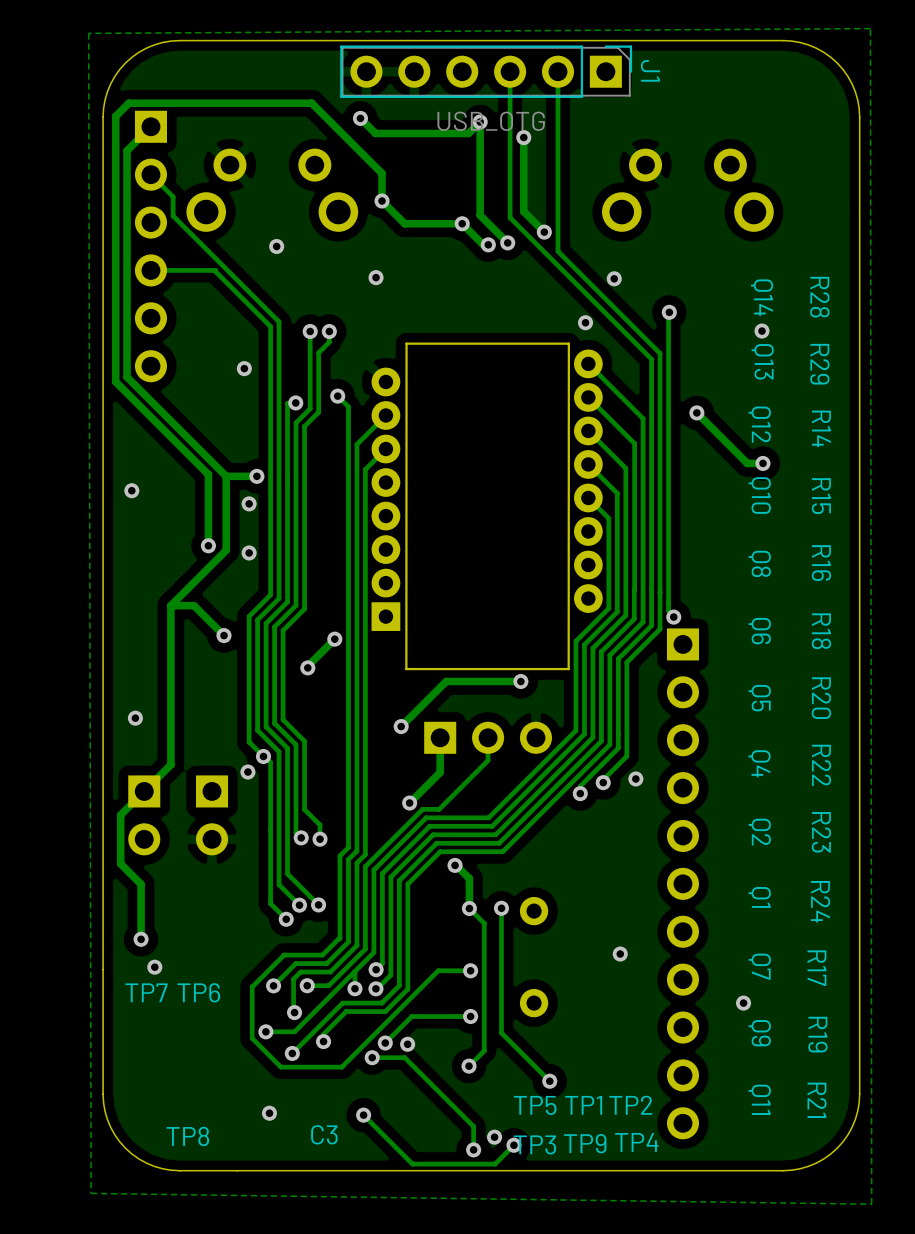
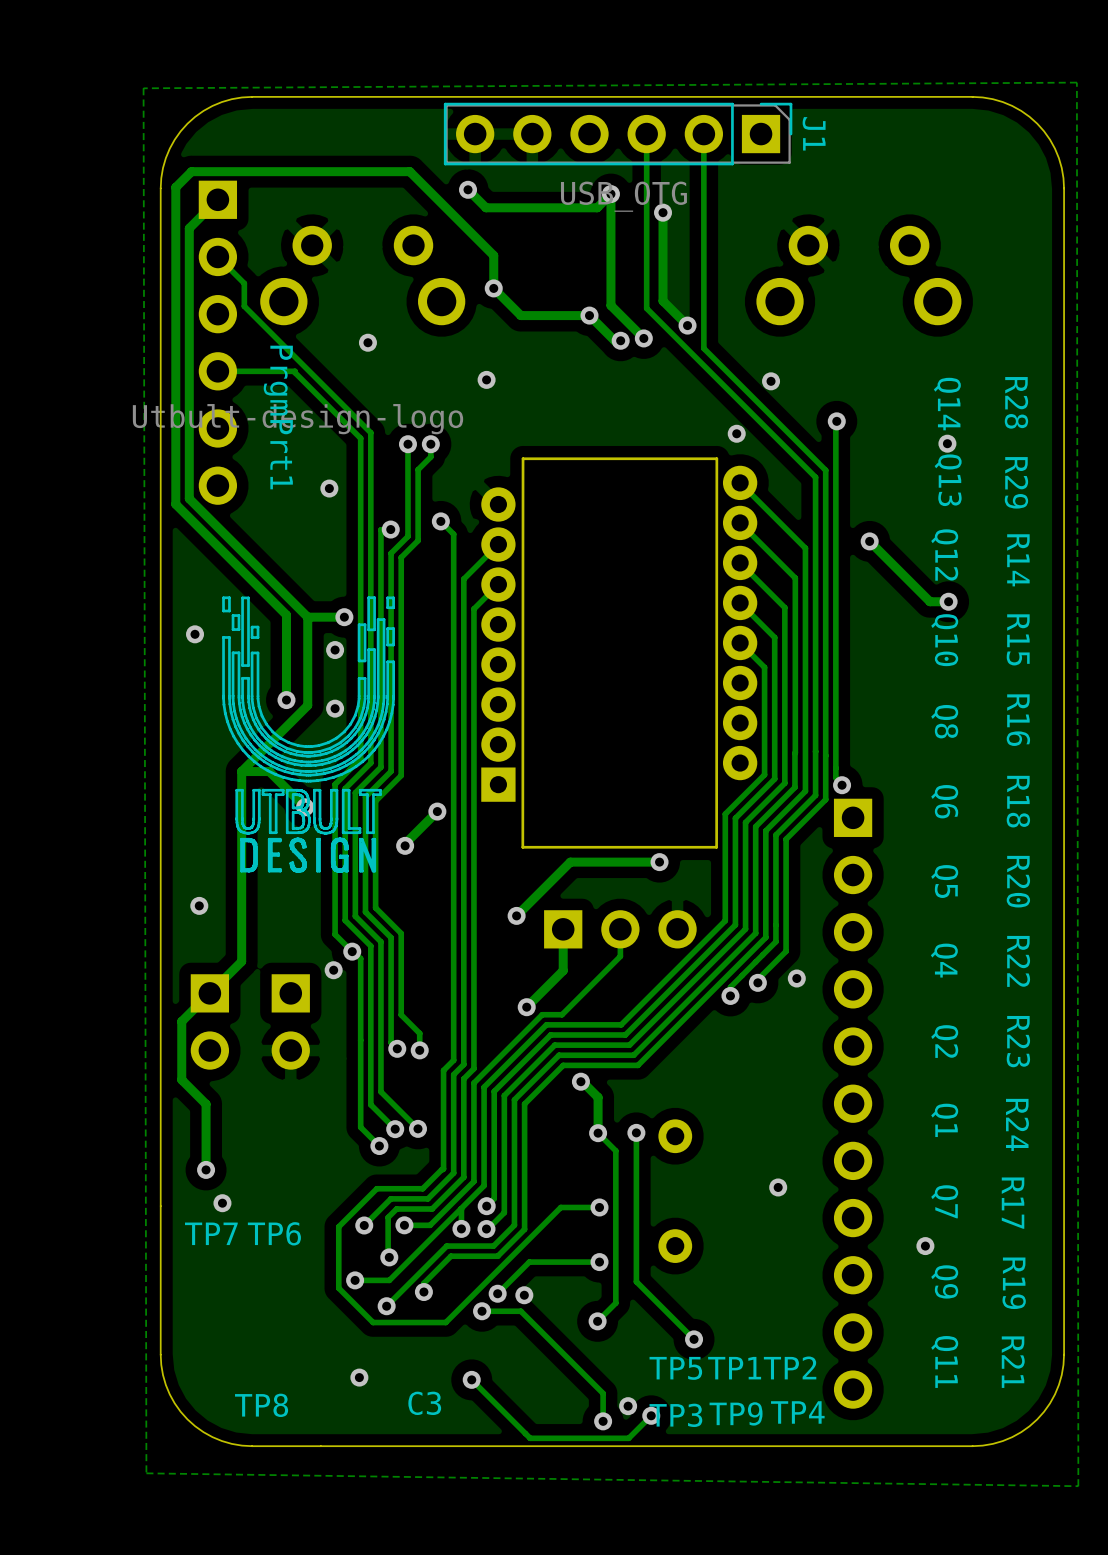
PrgmPrt1 name: none -> PrgmPrt1 (278, 417)
drawing: none -> [222, 596, 396, 873]

